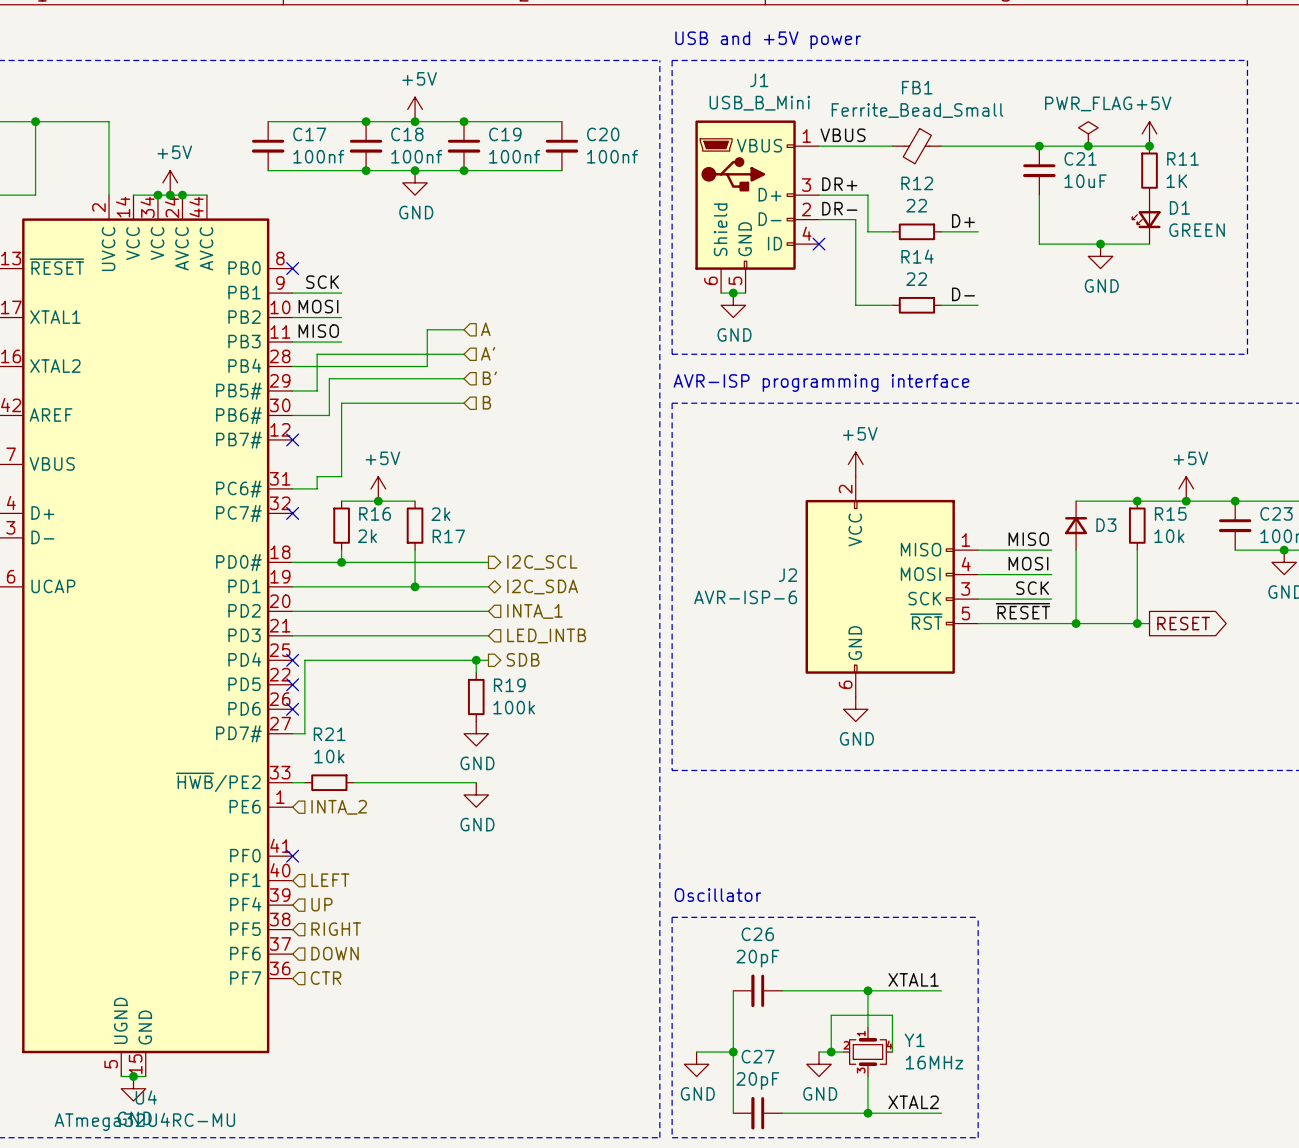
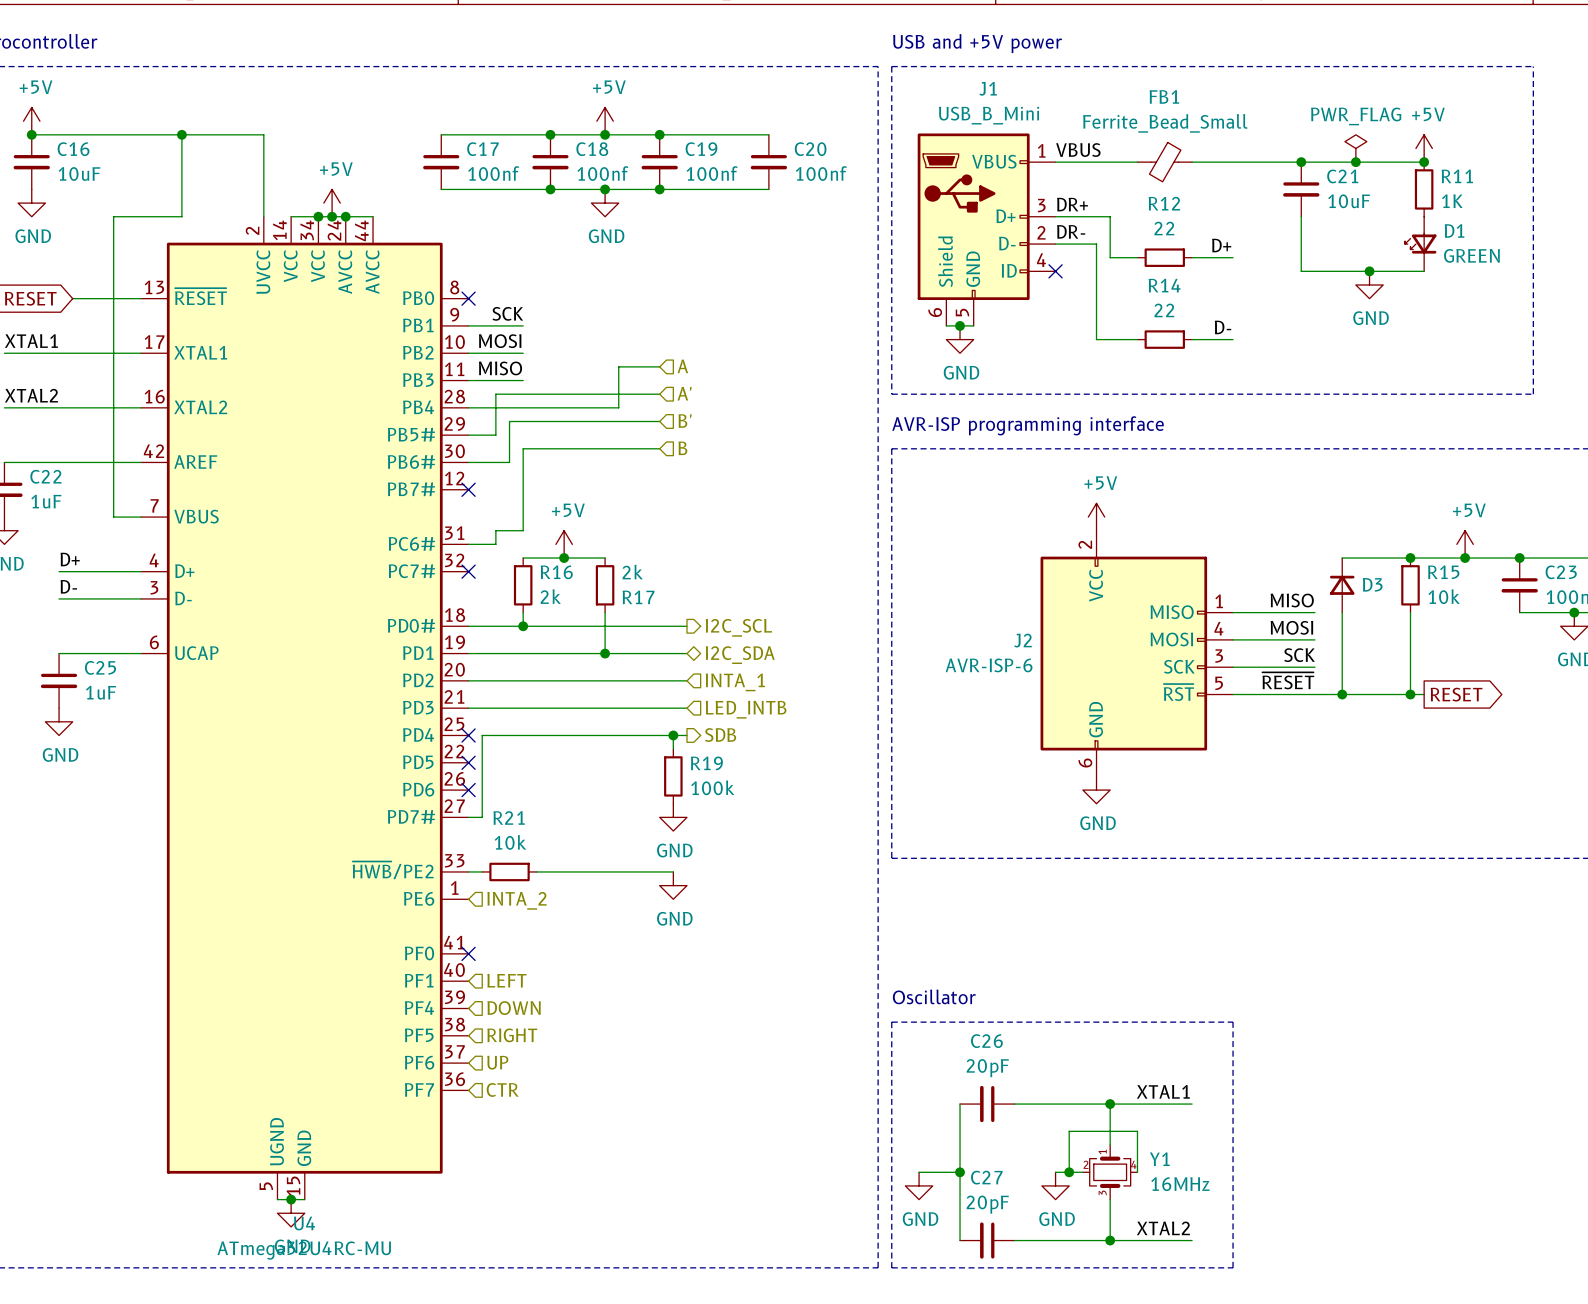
hierarchical label: UP (321, 904) -> DOWN (514, 1008)
hierarchical label: DOWN (335, 953) -> UP (497, 1062)

